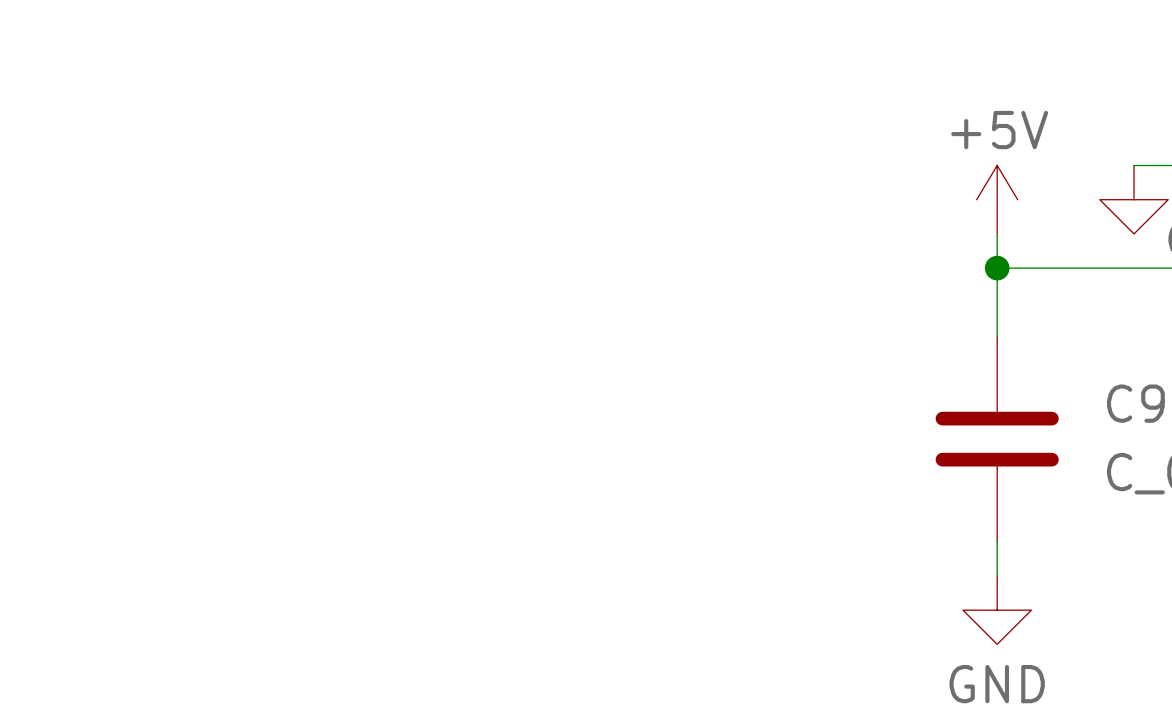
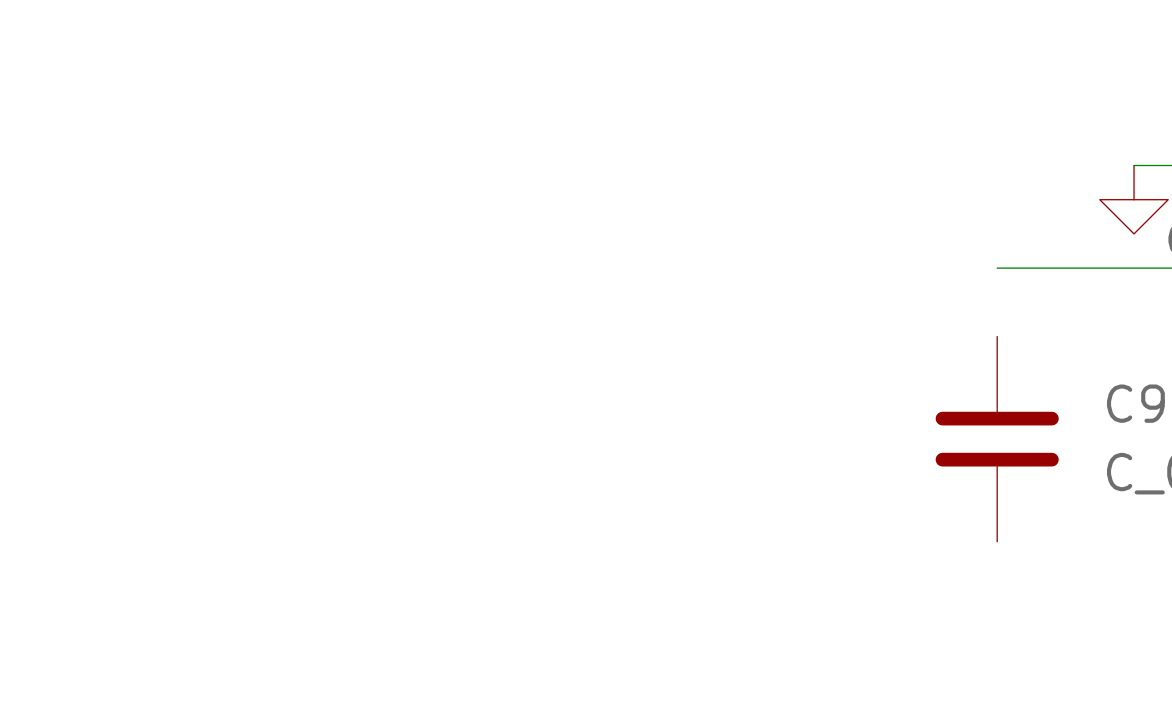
power symbol: +5V (997, 199) -> none
wire: (997, 233) (997, 336) -> none
junction: (997, 268) -> none
wire: (997, 541) (997, 575) -> none
power symbol: GND (997, 610) -> none

